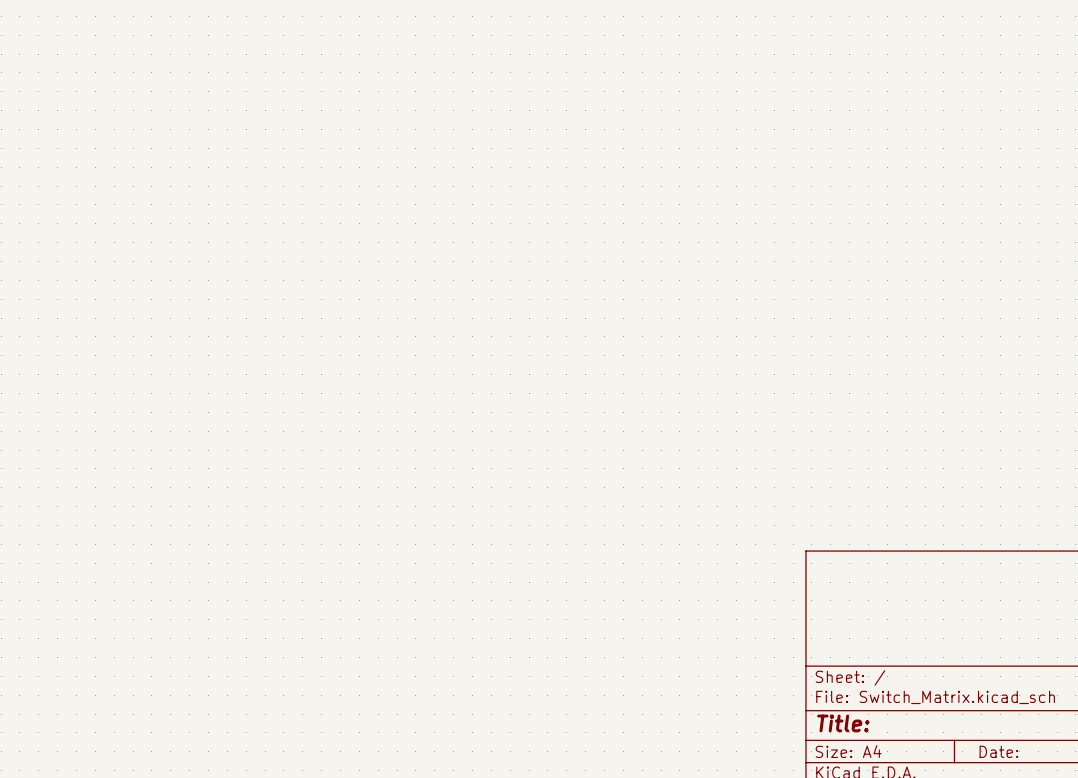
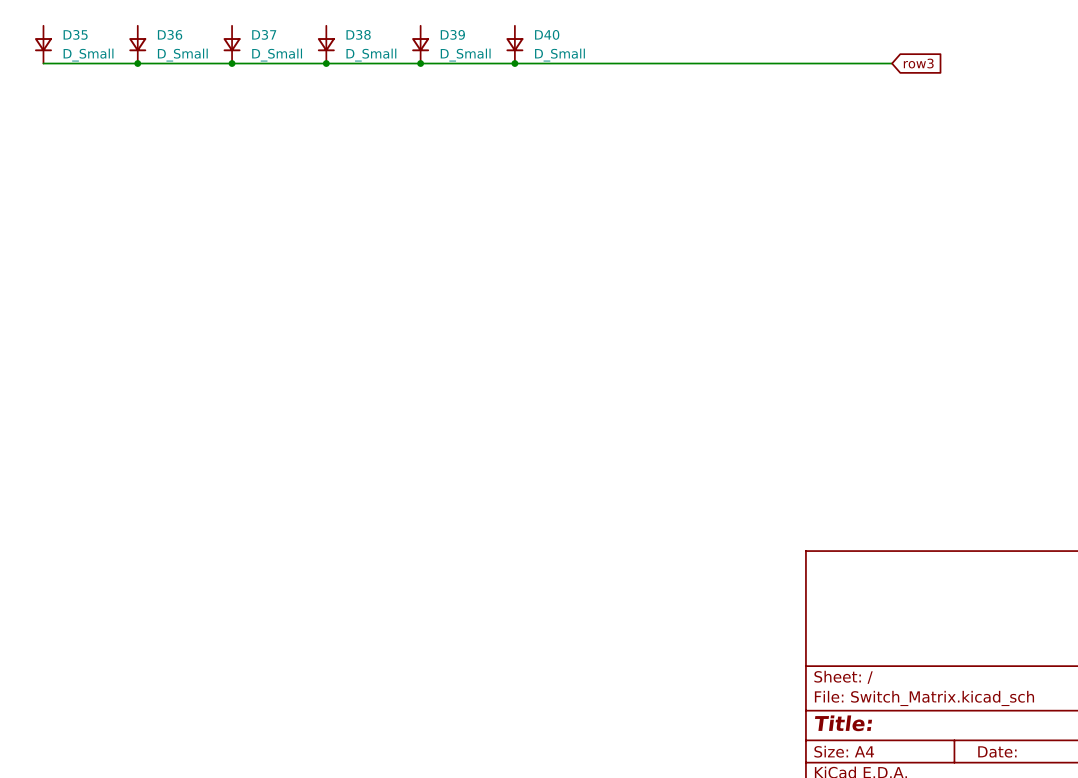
D35: none -> D_Small (43, 44)
D36: none -> D_Small (137, 44)
D37: none -> D_Small (232, 44)
D38: none -> D_Small (326, 44)
D39: none -> D_Small (420, 44)
D40: none -> D_Small (514, 44)
wire: none -> (43, 63) (892, 63)
junction: none -> (137, 63)
junction: none -> (232, 63)
junction: none -> (326, 63)
junction: none -> (420, 63)
junction: none -> (514, 63)
global label: none -> row3 (918, 63)

